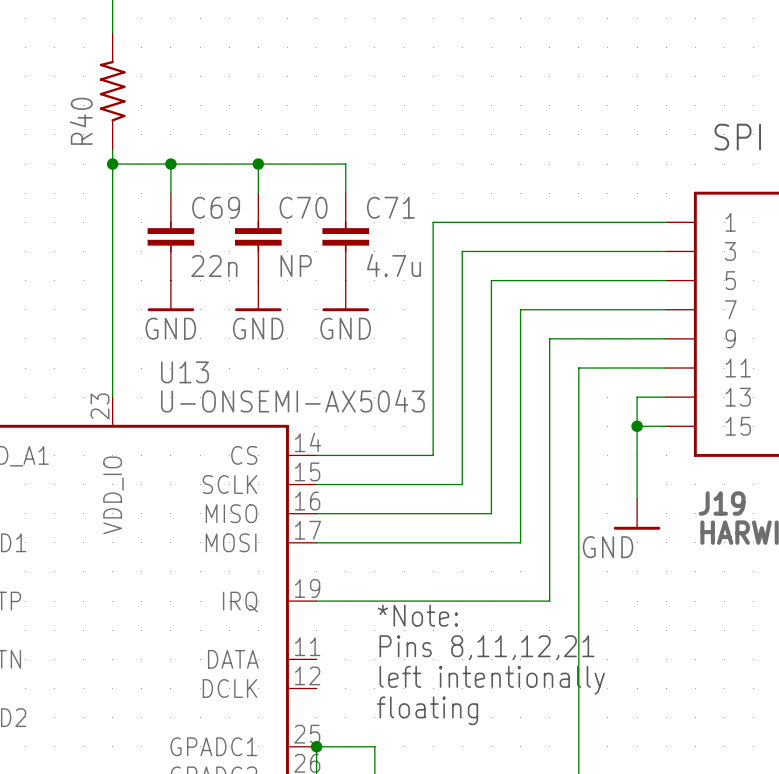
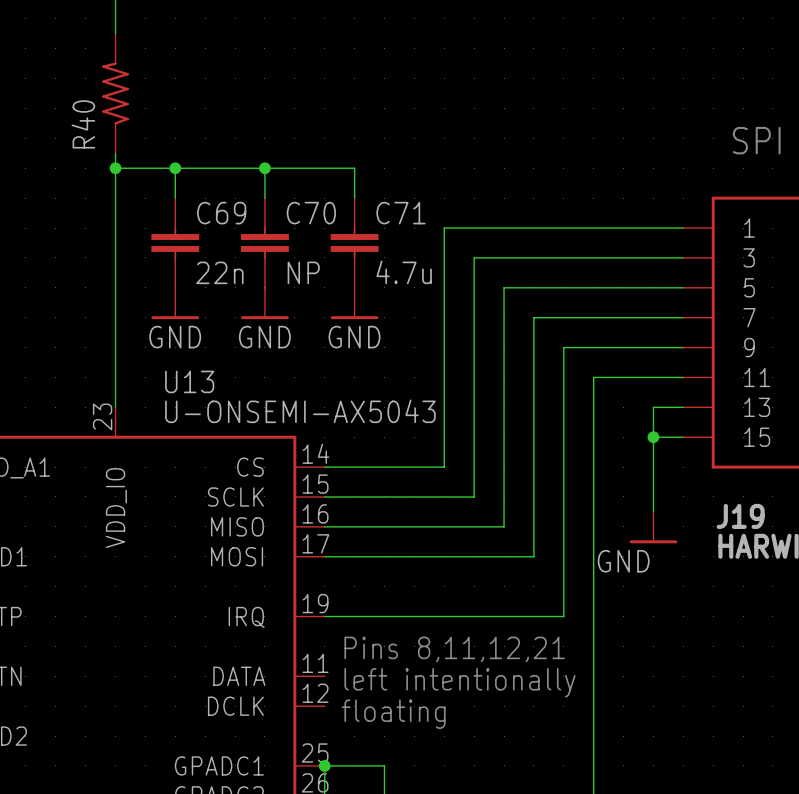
text: *Note: (417, 615) -> none
text position: Pins 8,11,12,21 (486, 647) -> Pins 8,11,12,21 (454, 649)
text position: left intentionally (492, 680) -> left intentionally (460, 682)
text position: floating (427, 710) -> floating (393, 714)

